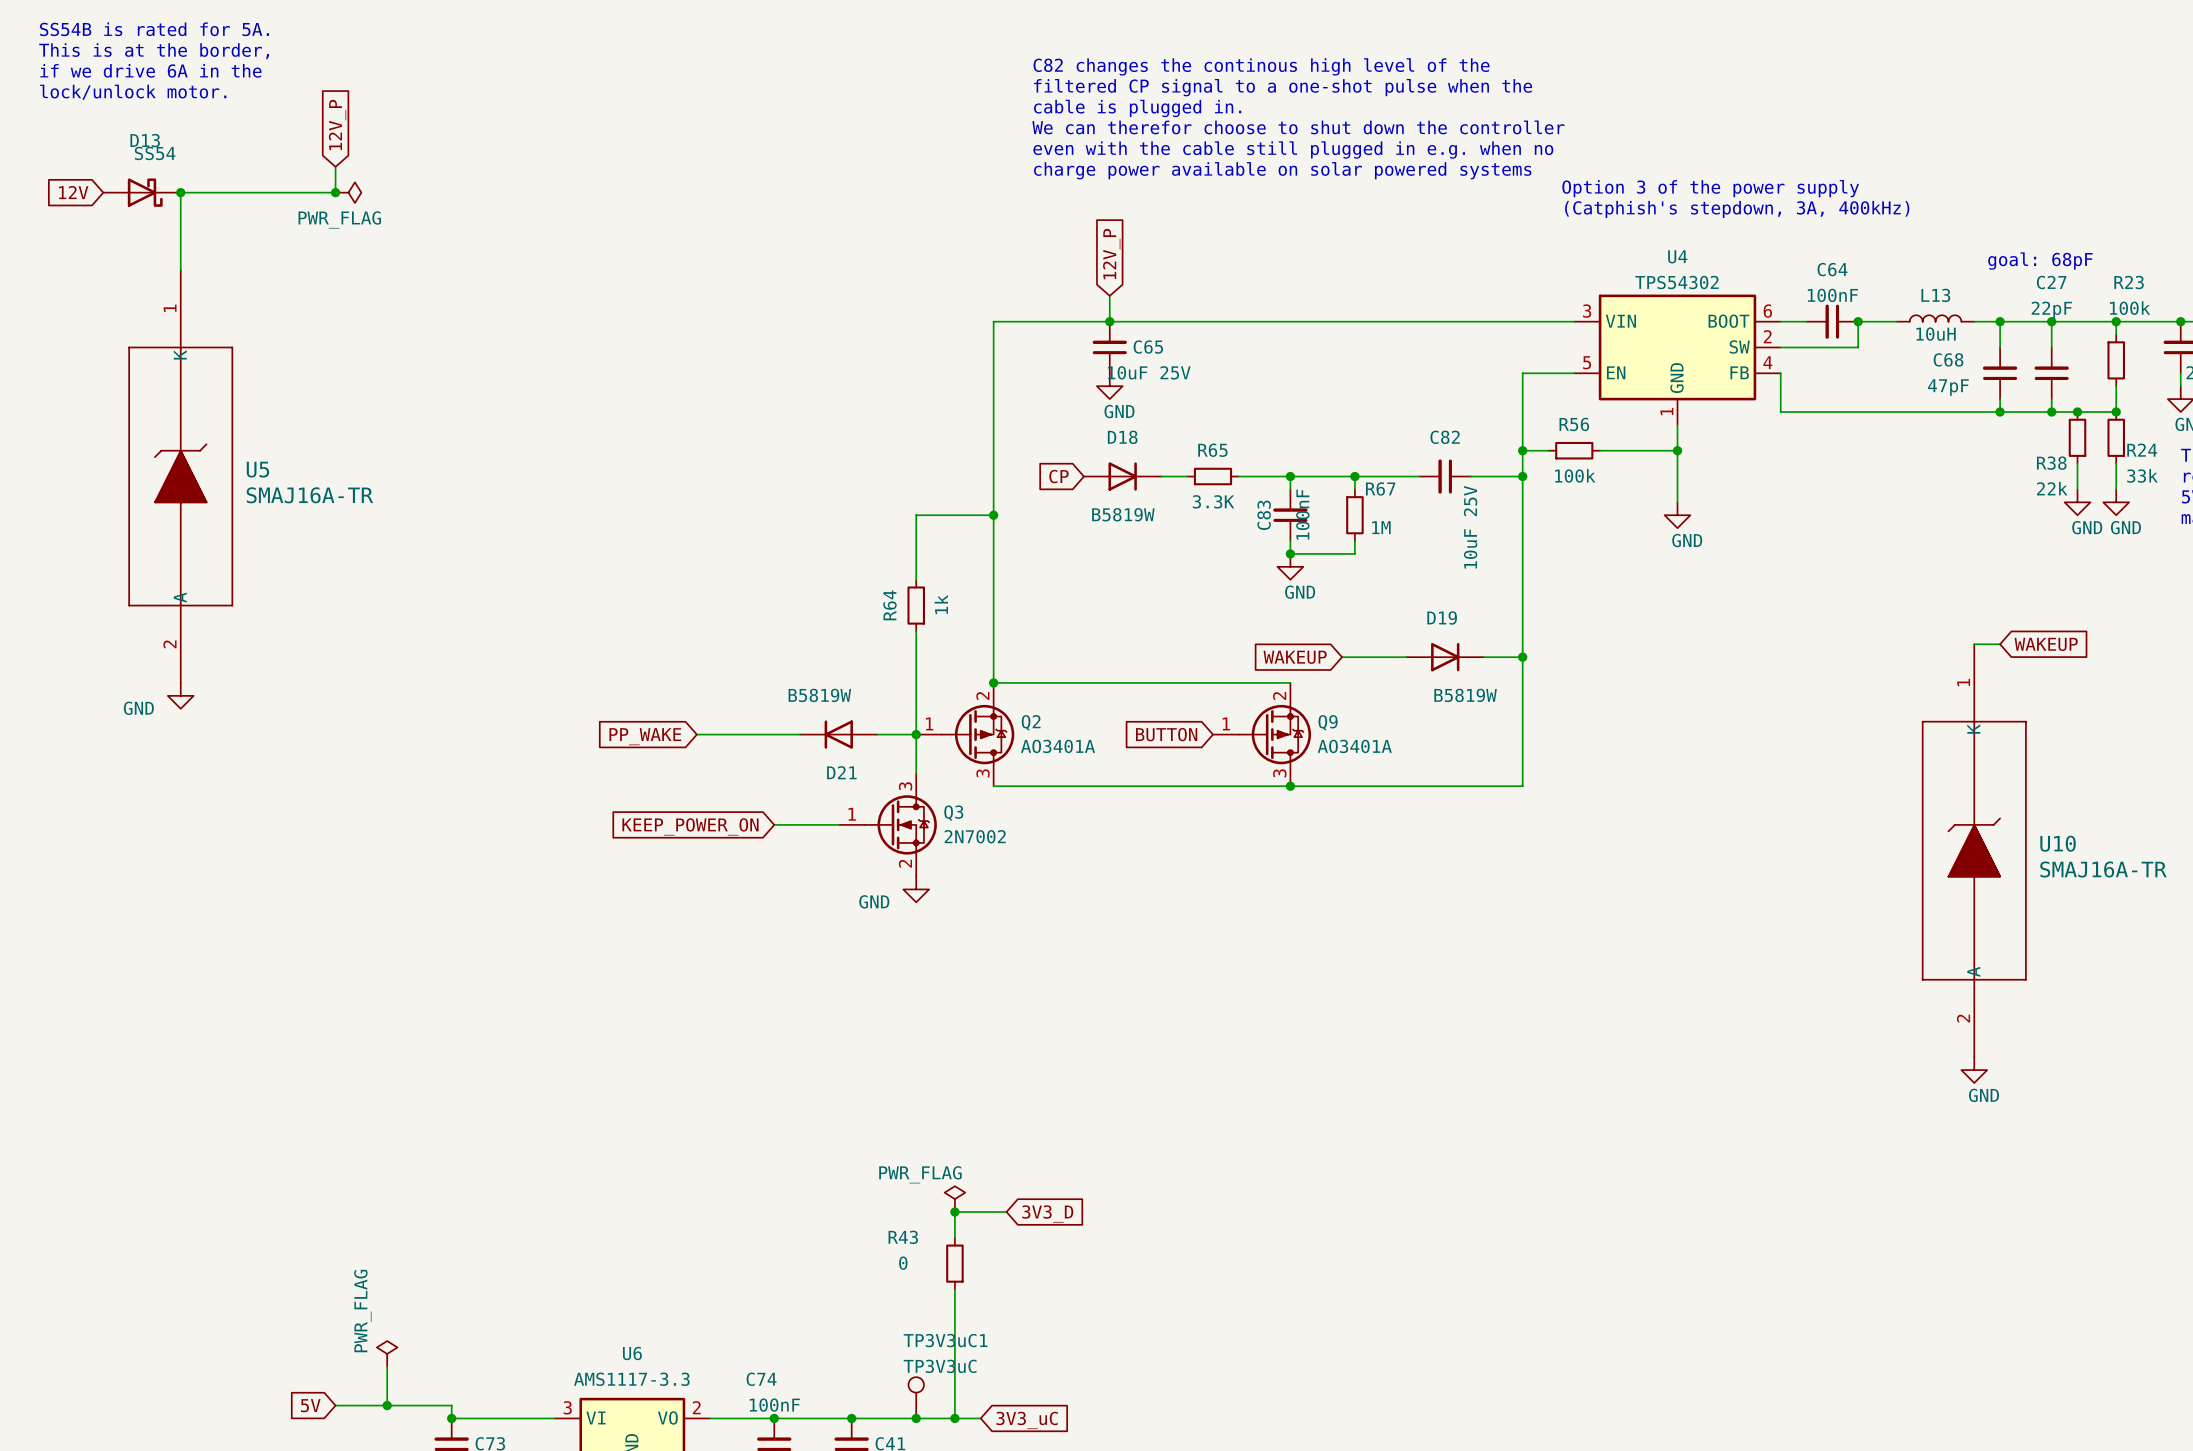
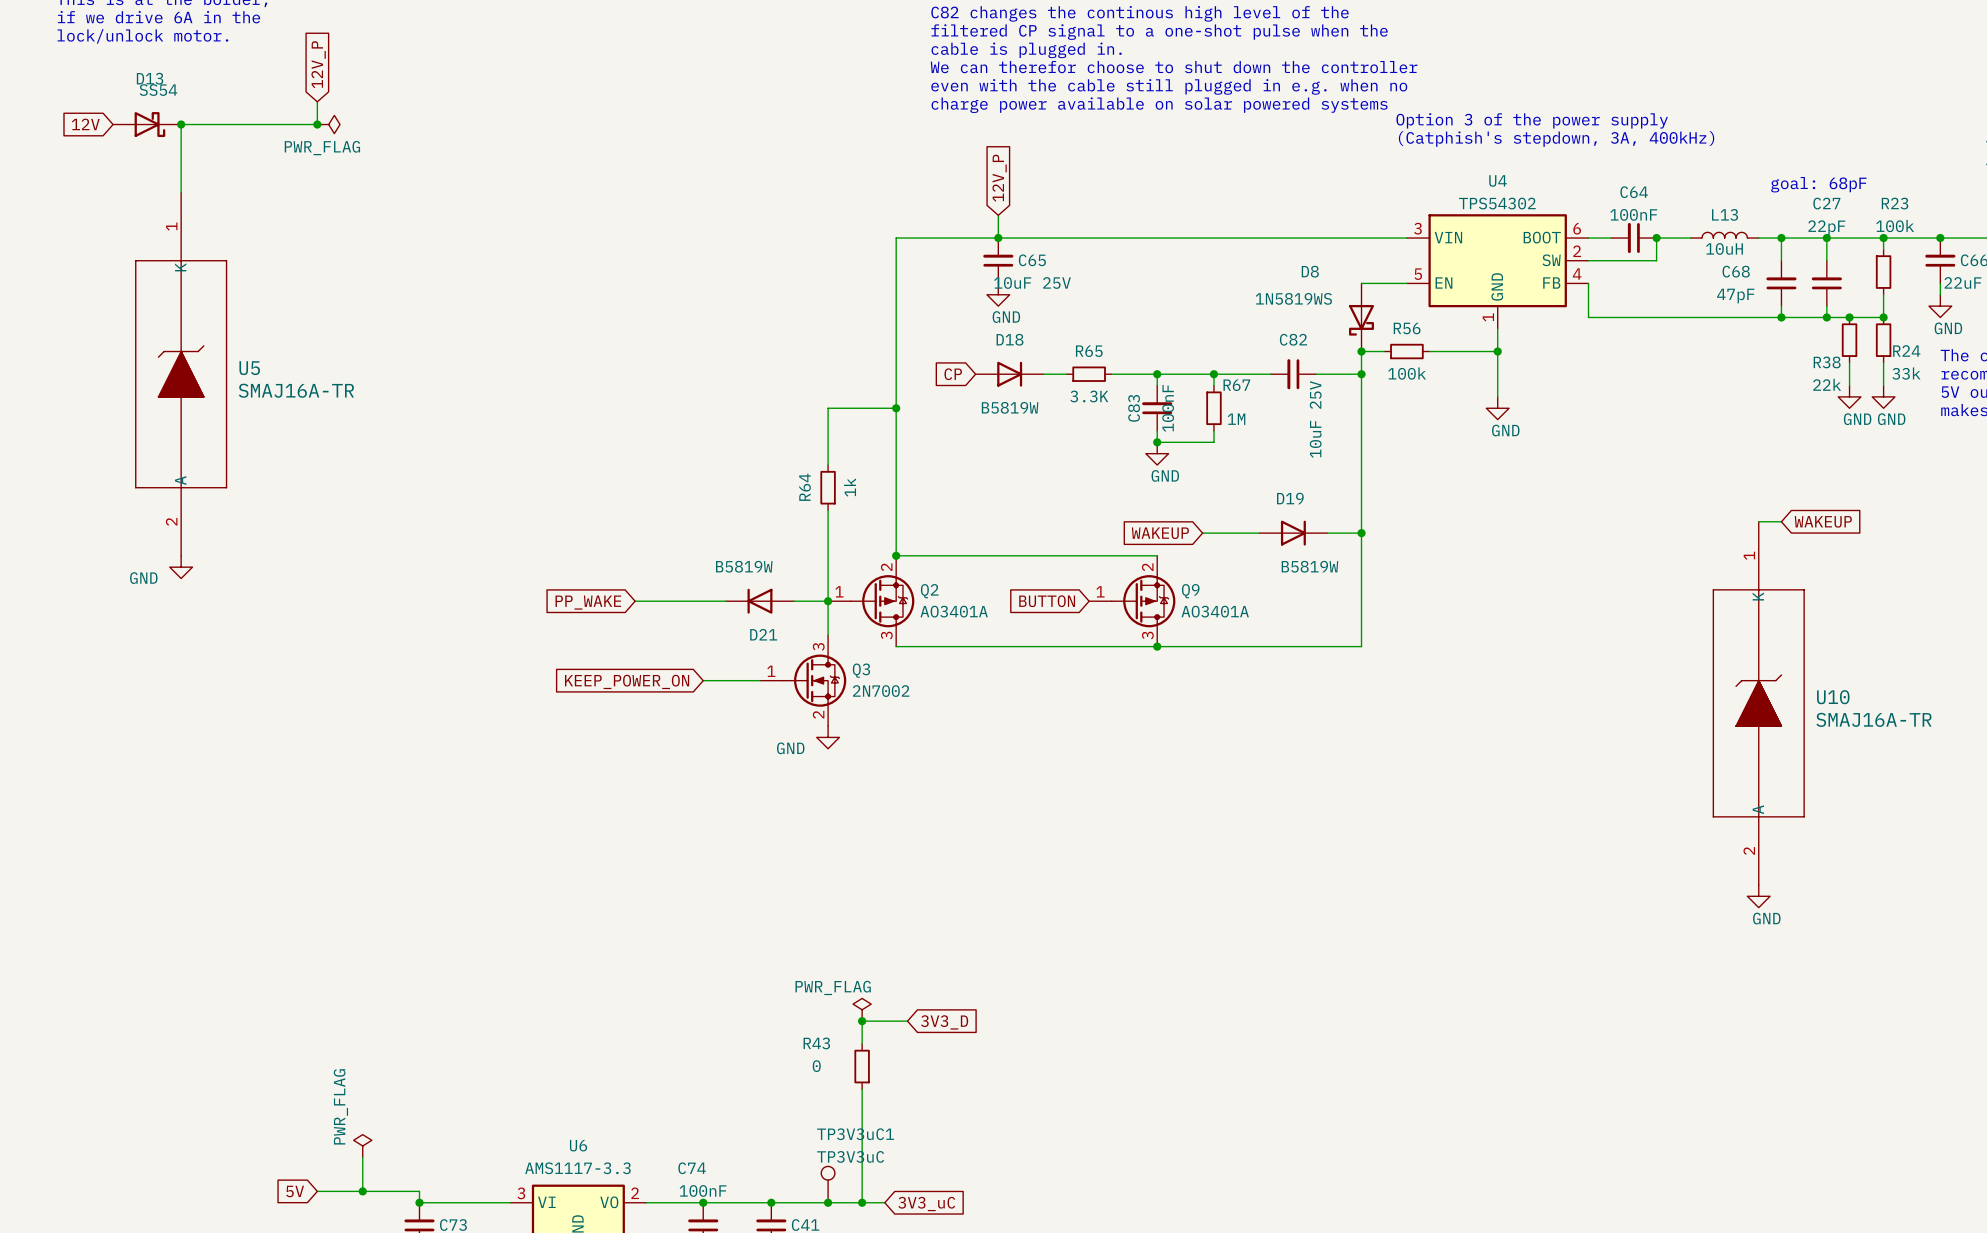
D8: none -> 1N5819WS (1361, 317)

